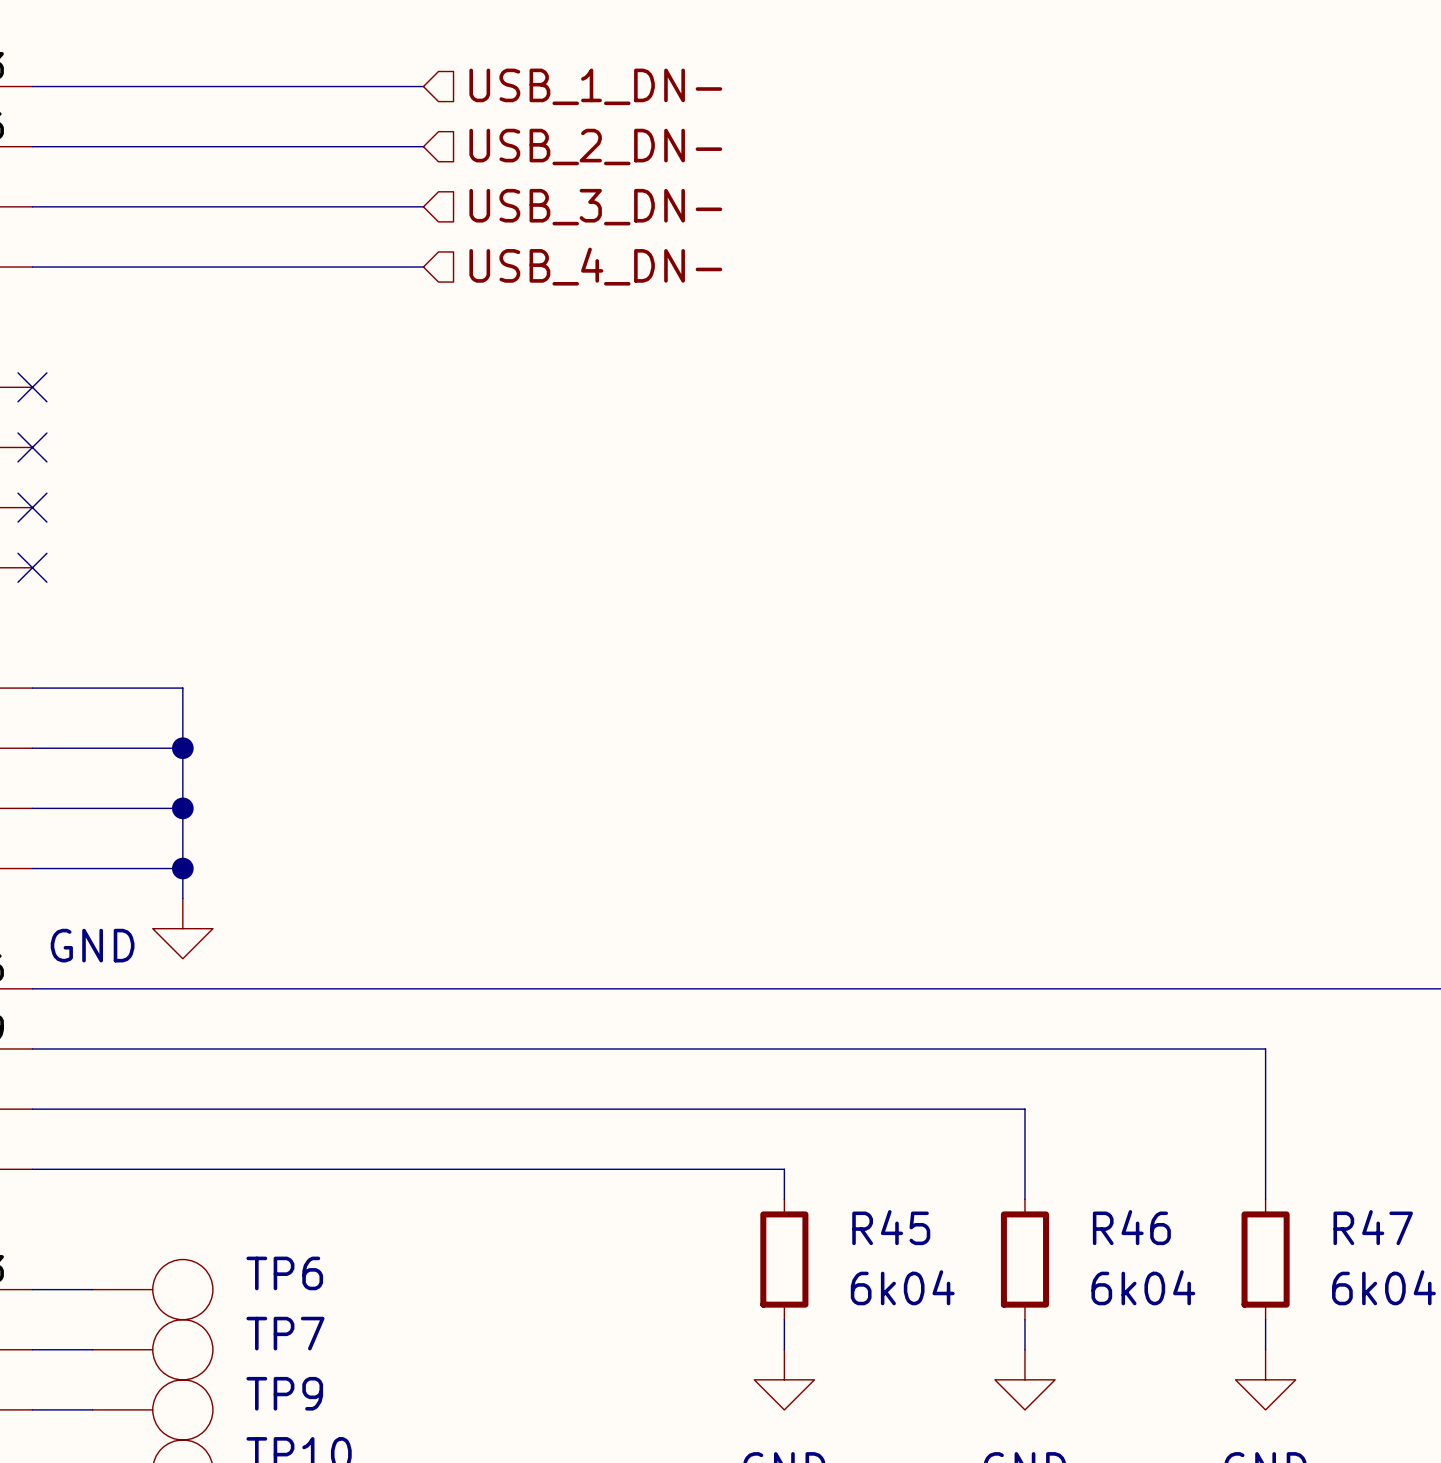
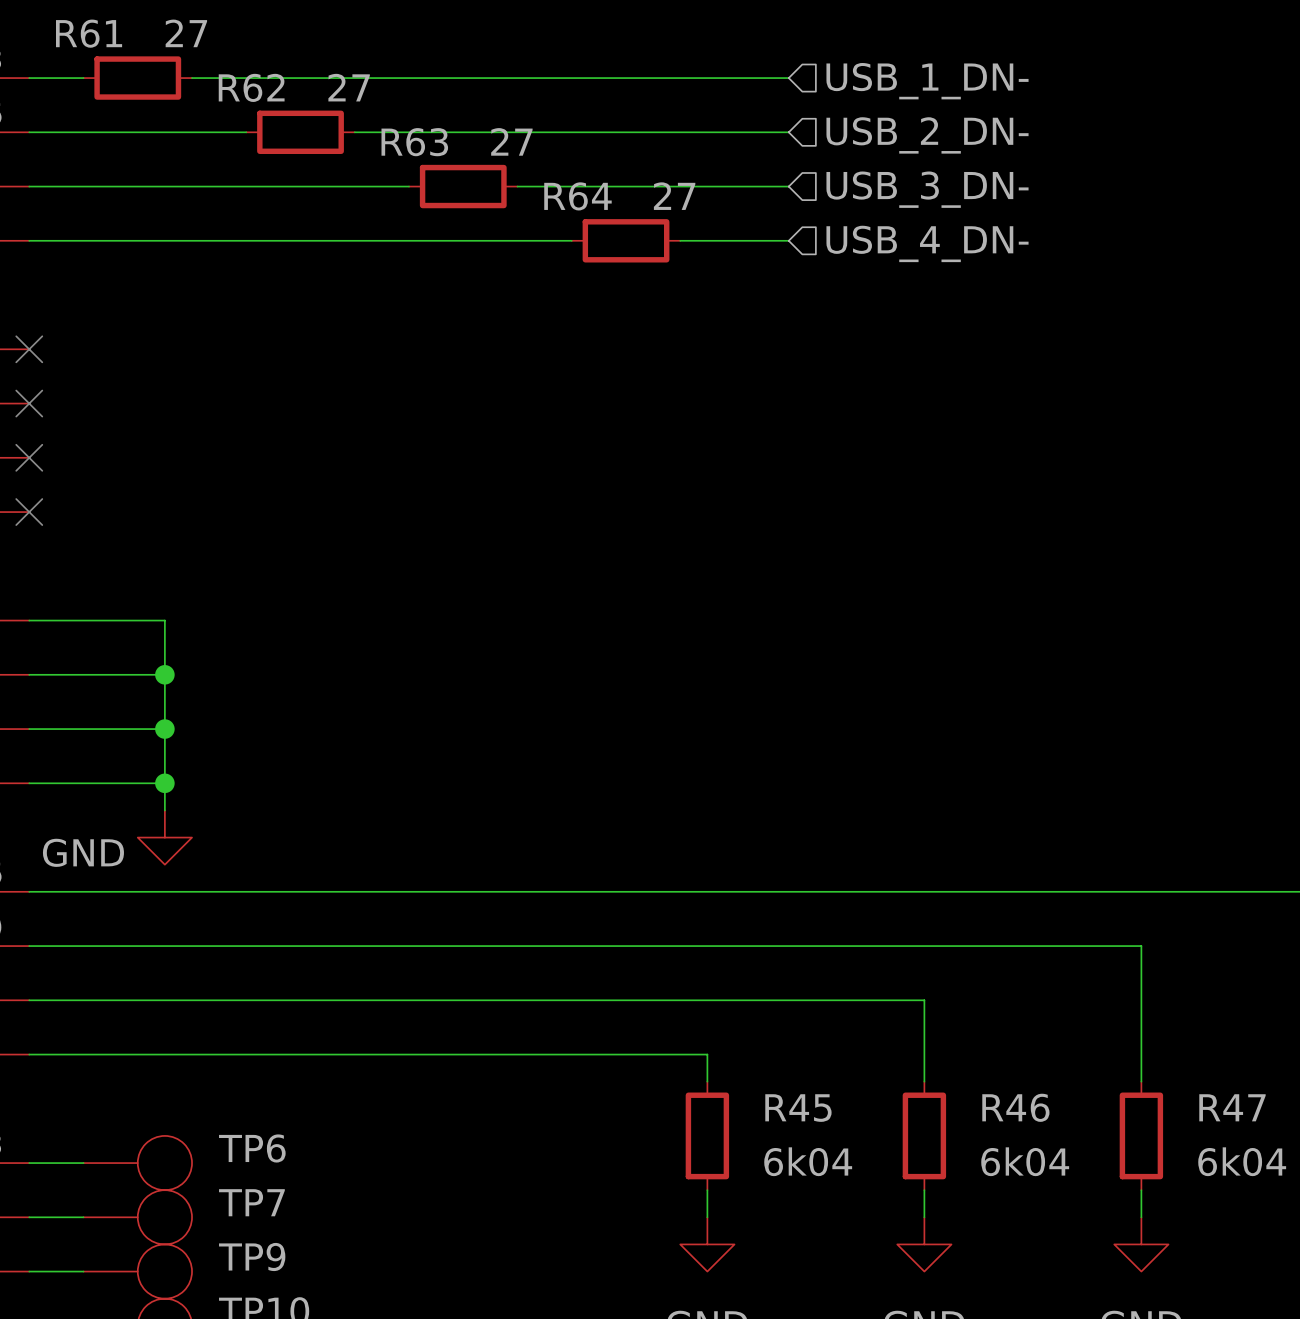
wire: (92, 86) (212, 86) -> none
R61: none -> (137, 78)
wire: none -> (381, 78) (788, 78)
hierarchical label position: USB_1_DN- (595, 86) -> USB_1_DN- (927, 81)
wire: (273, 146) (393, 146) -> (680, 240) (788, 240)
R62: none -> (300, 132)
wire: none -> (381, 132) (788, 132)
hierarchical label position: USB_2_DN- (595, 147) -> USB_2_DN- (927, 135)
wire: none -> (381, 186) (409, 186)
R63: none -> (463, 186)
wire: none -> (517, 186) (788, 186)
hierarchical label position: USB_3_DN- (595, 207) -> USB_3_DN- (927, 189)
hierarchical label position: USB_4_DN- (595, 266) -> USB_4_DN- (927, 243)
wire: none -> (381, 240) (571, 240)
R64: none -> (626, 240)

